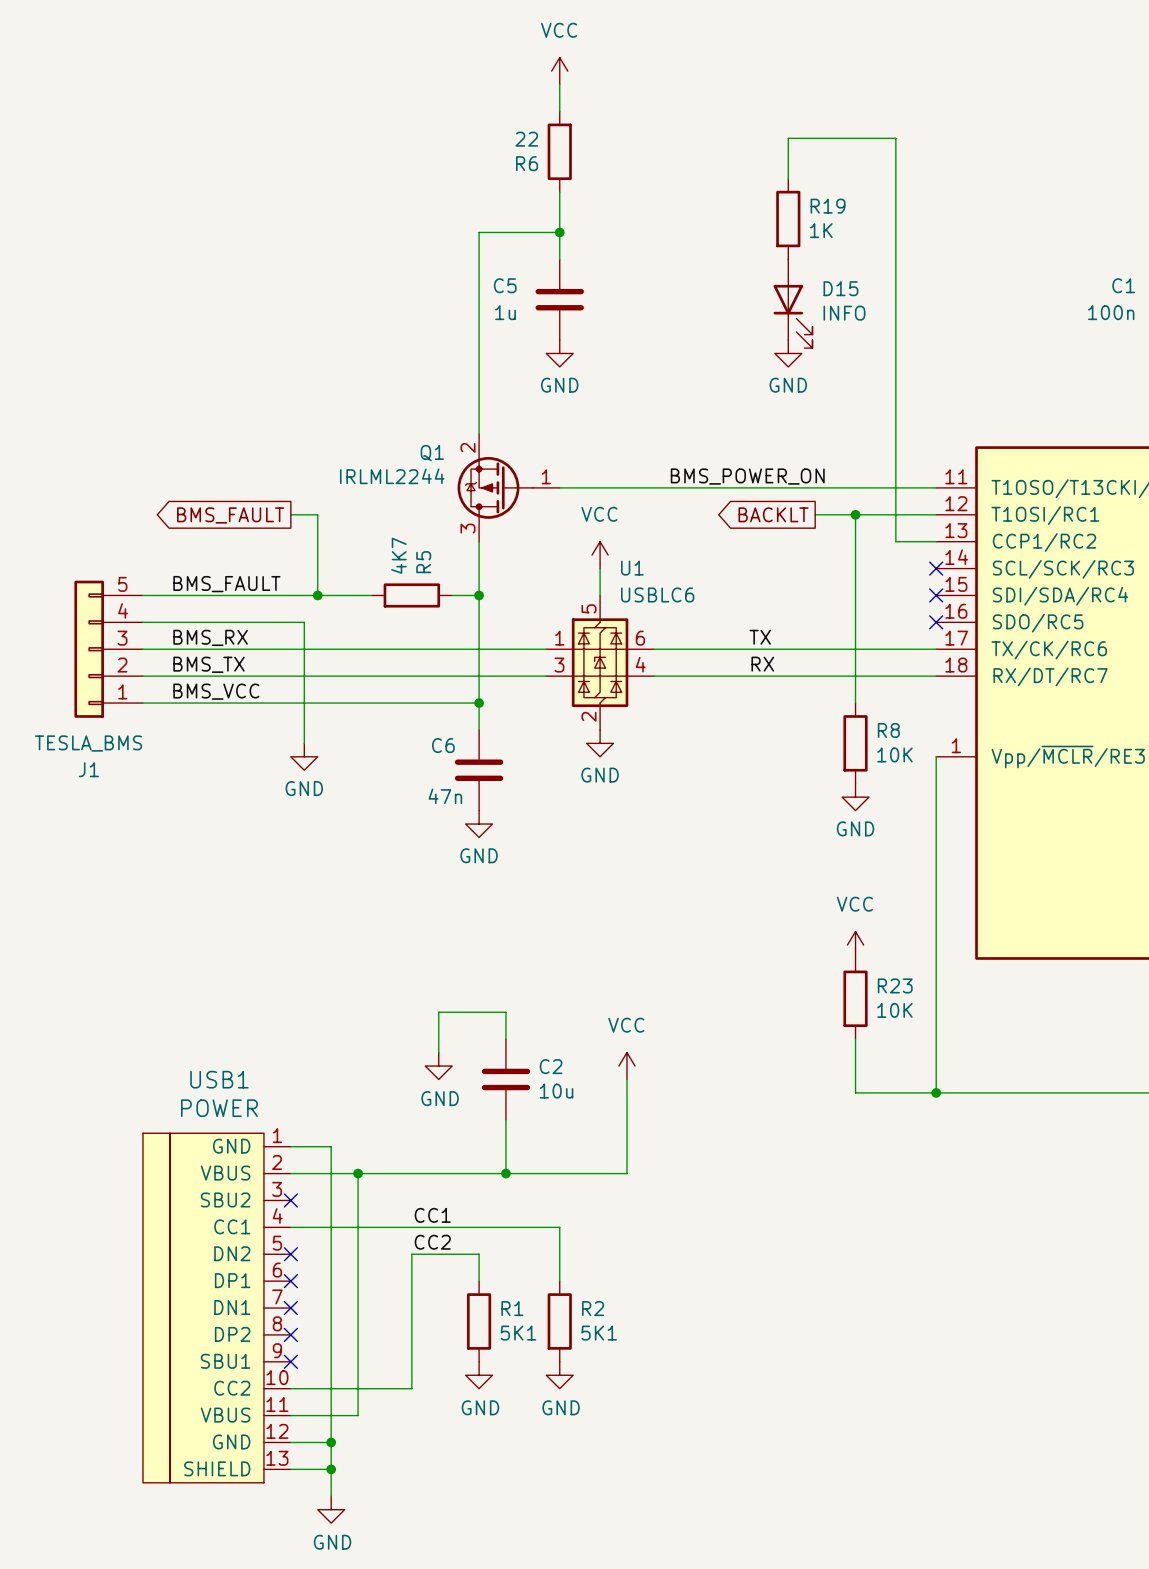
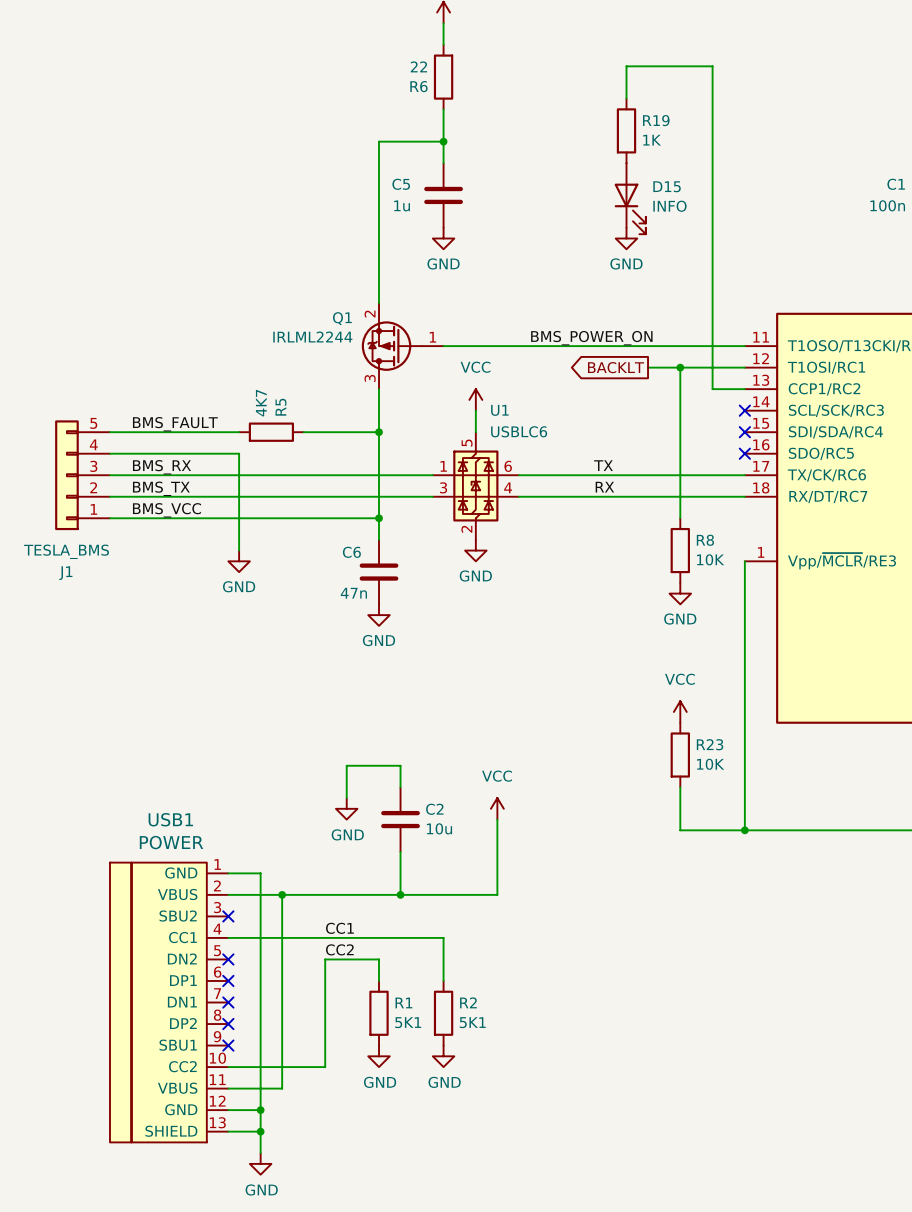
wire: (290, 514) (317, 514) (317, 595) -> none
global label: BMS_FAULT (230, 515) -> none
wire: (304, 595) (371, 595) -> (303, 432) (357, 432)
junction: (317, 595) -> none
R5 position: (411, 595) -> (271, 432)

